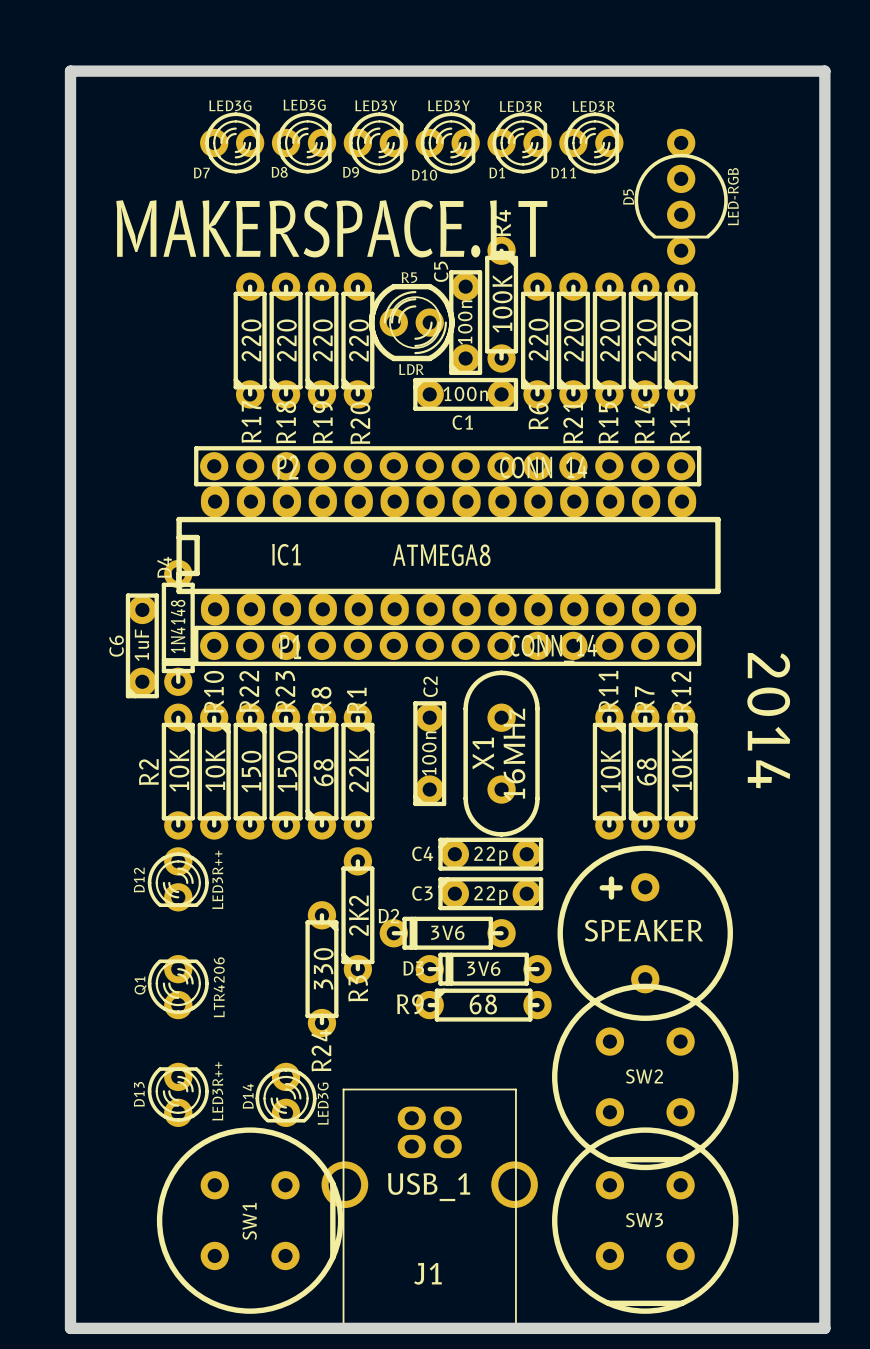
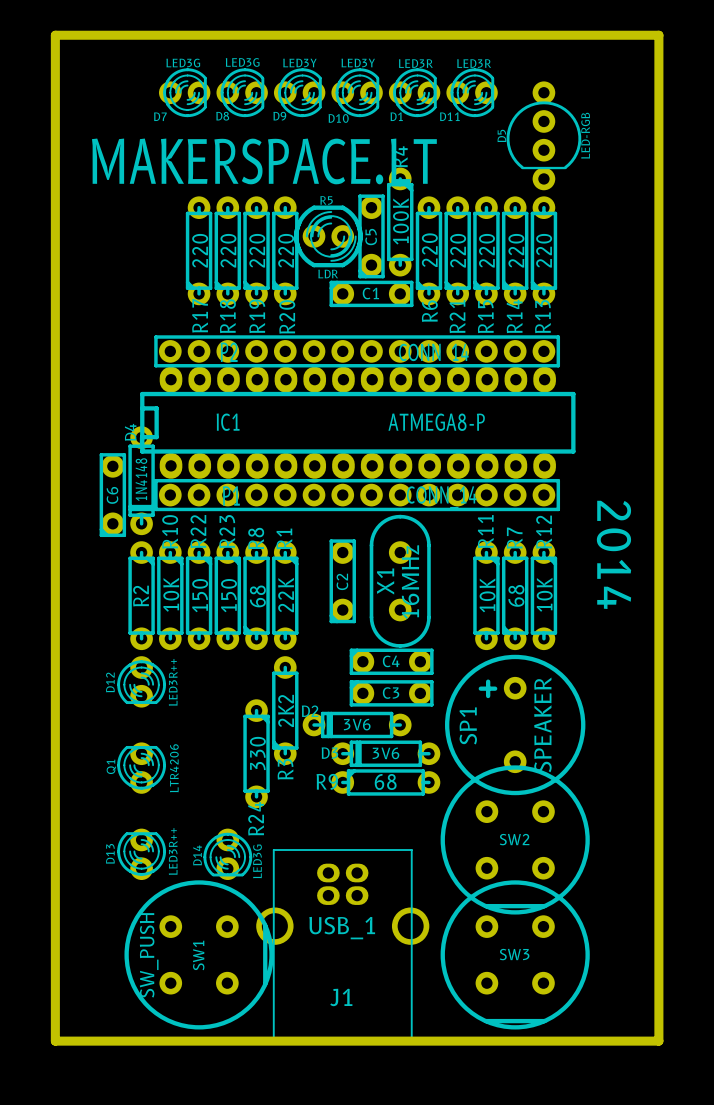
C5 name position: C5 (441, 271) -> C5 (371, 237)
C5 value: 100n (465, 322) -> none
C1 value: 100n (465, 393) -> none
C1 name position: C1 (462, 422) -> C1 (370, 293)
IC1 value: ATMEGA8 (441, 555) -> ATMEGA8-P (436, 422)
C6 value: 1uF (141, 645) -> none
C6 name position: C6 (116, 646) -> C6 (112, 495)
C2 name position: C2 (430, 686) -> C2 (342, 581)
C2 value: 100n (429, 753) -> none
R2 value: 10K (179, 770) -> none
R2 name position: R2 (148, 772) -> R2 (141, 596)
C4 name position: C4 (422, 853) -> C4 (391, 661)
C4 value: 22p (491, 856) -> none
C3 name position: C3 (422, 893) -> C3 (391, 693)
C3 value: 22p (491, 895) -> none
SP1 value rotation: 0° (643, 930) -> 90° counterclockwise (542, 724)
SP1 name: none -> SP1 (468, 725)
SW1 value: none -> SW_PUSH (149, 955)

